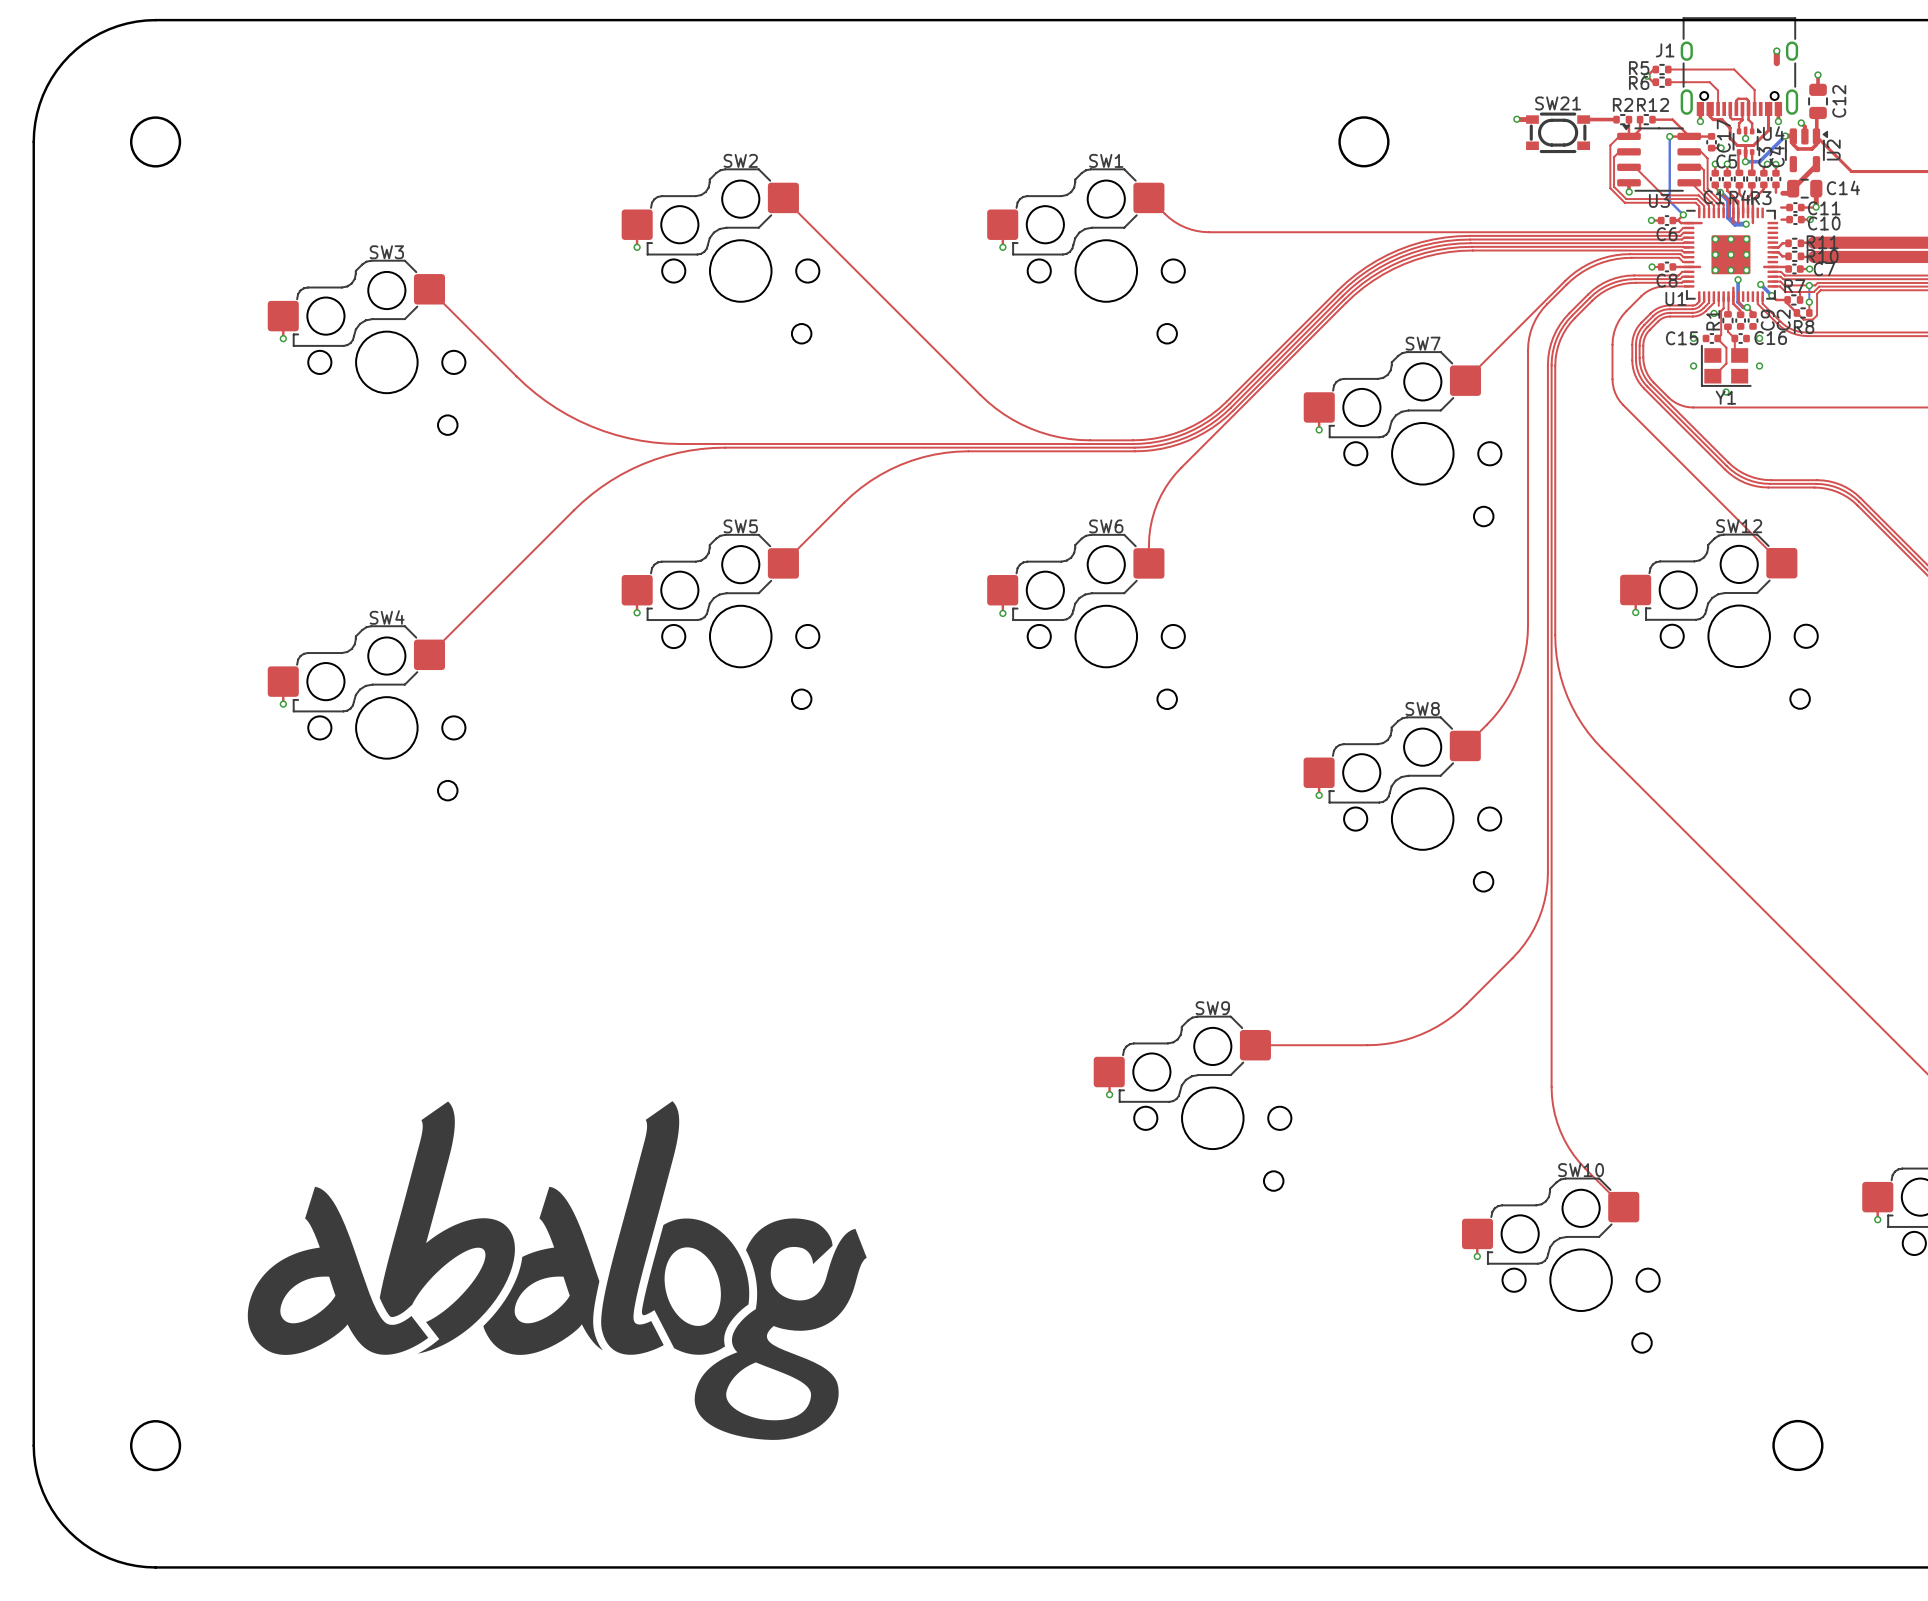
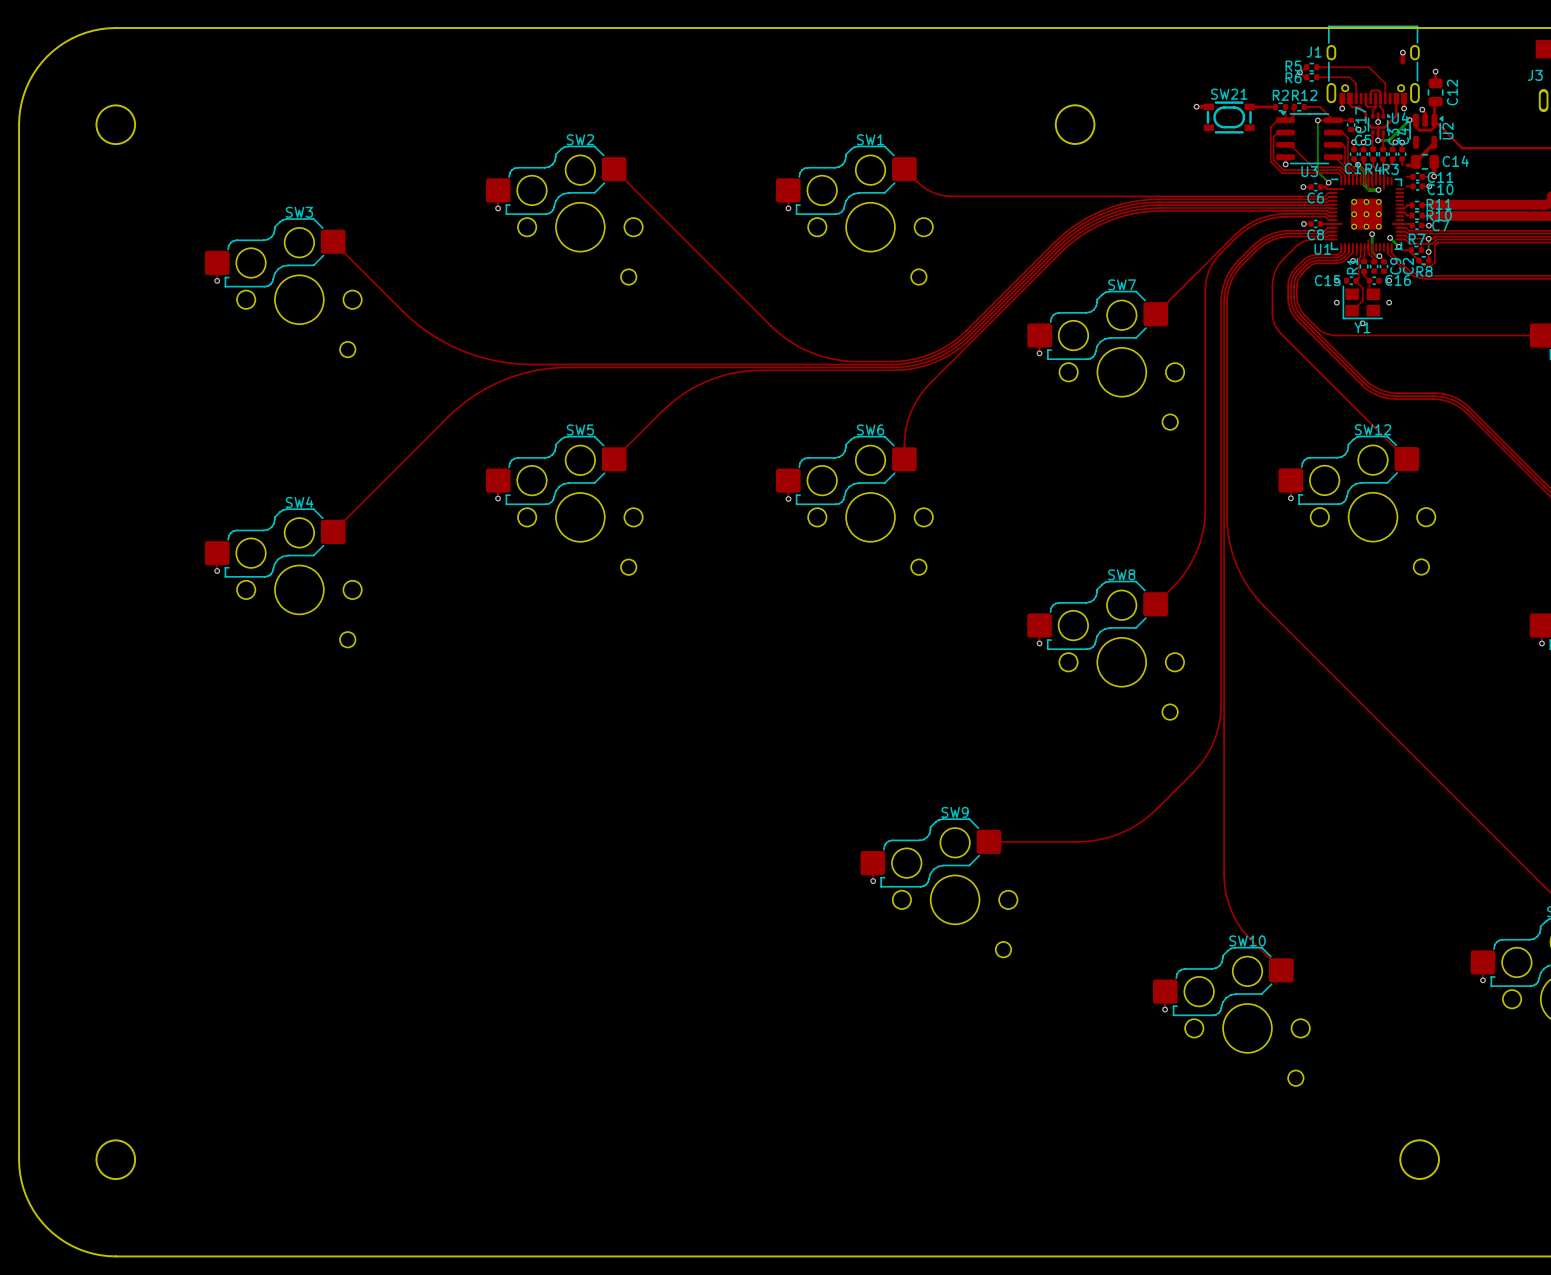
drawing: [247, 1101, 867, 1440] -> none

